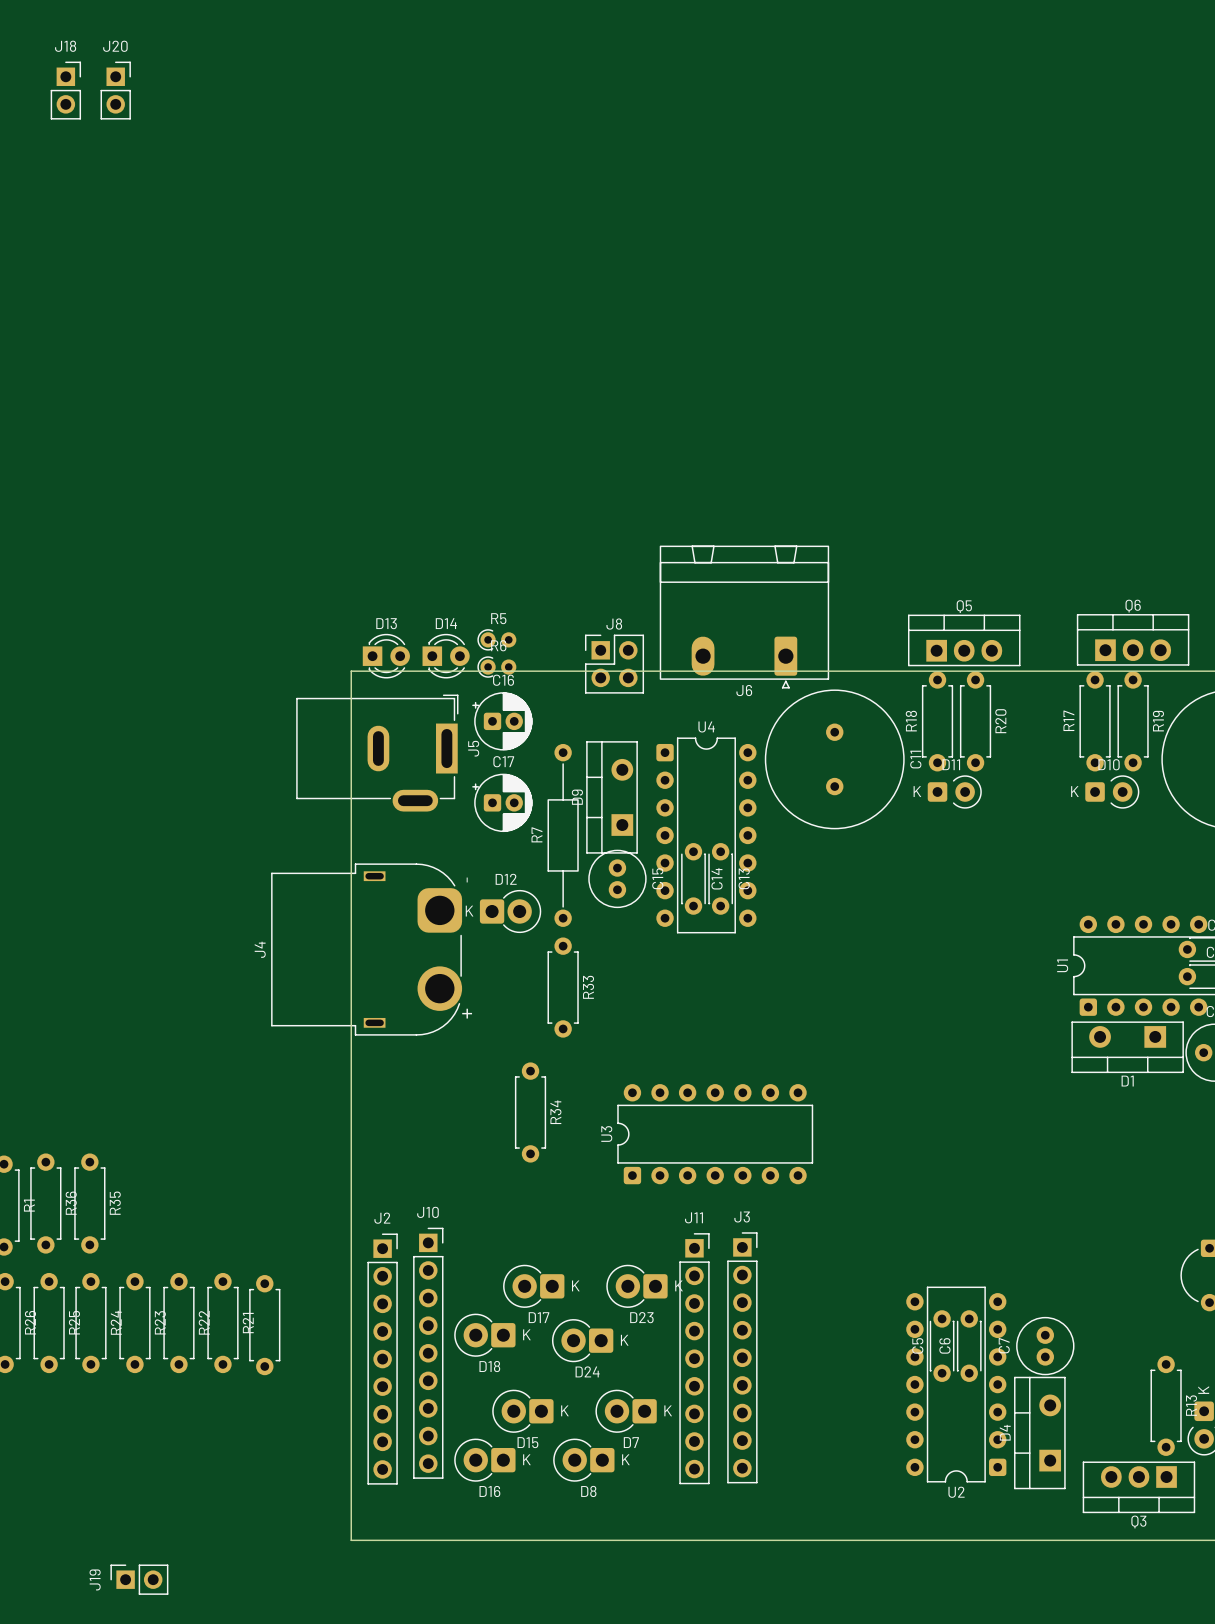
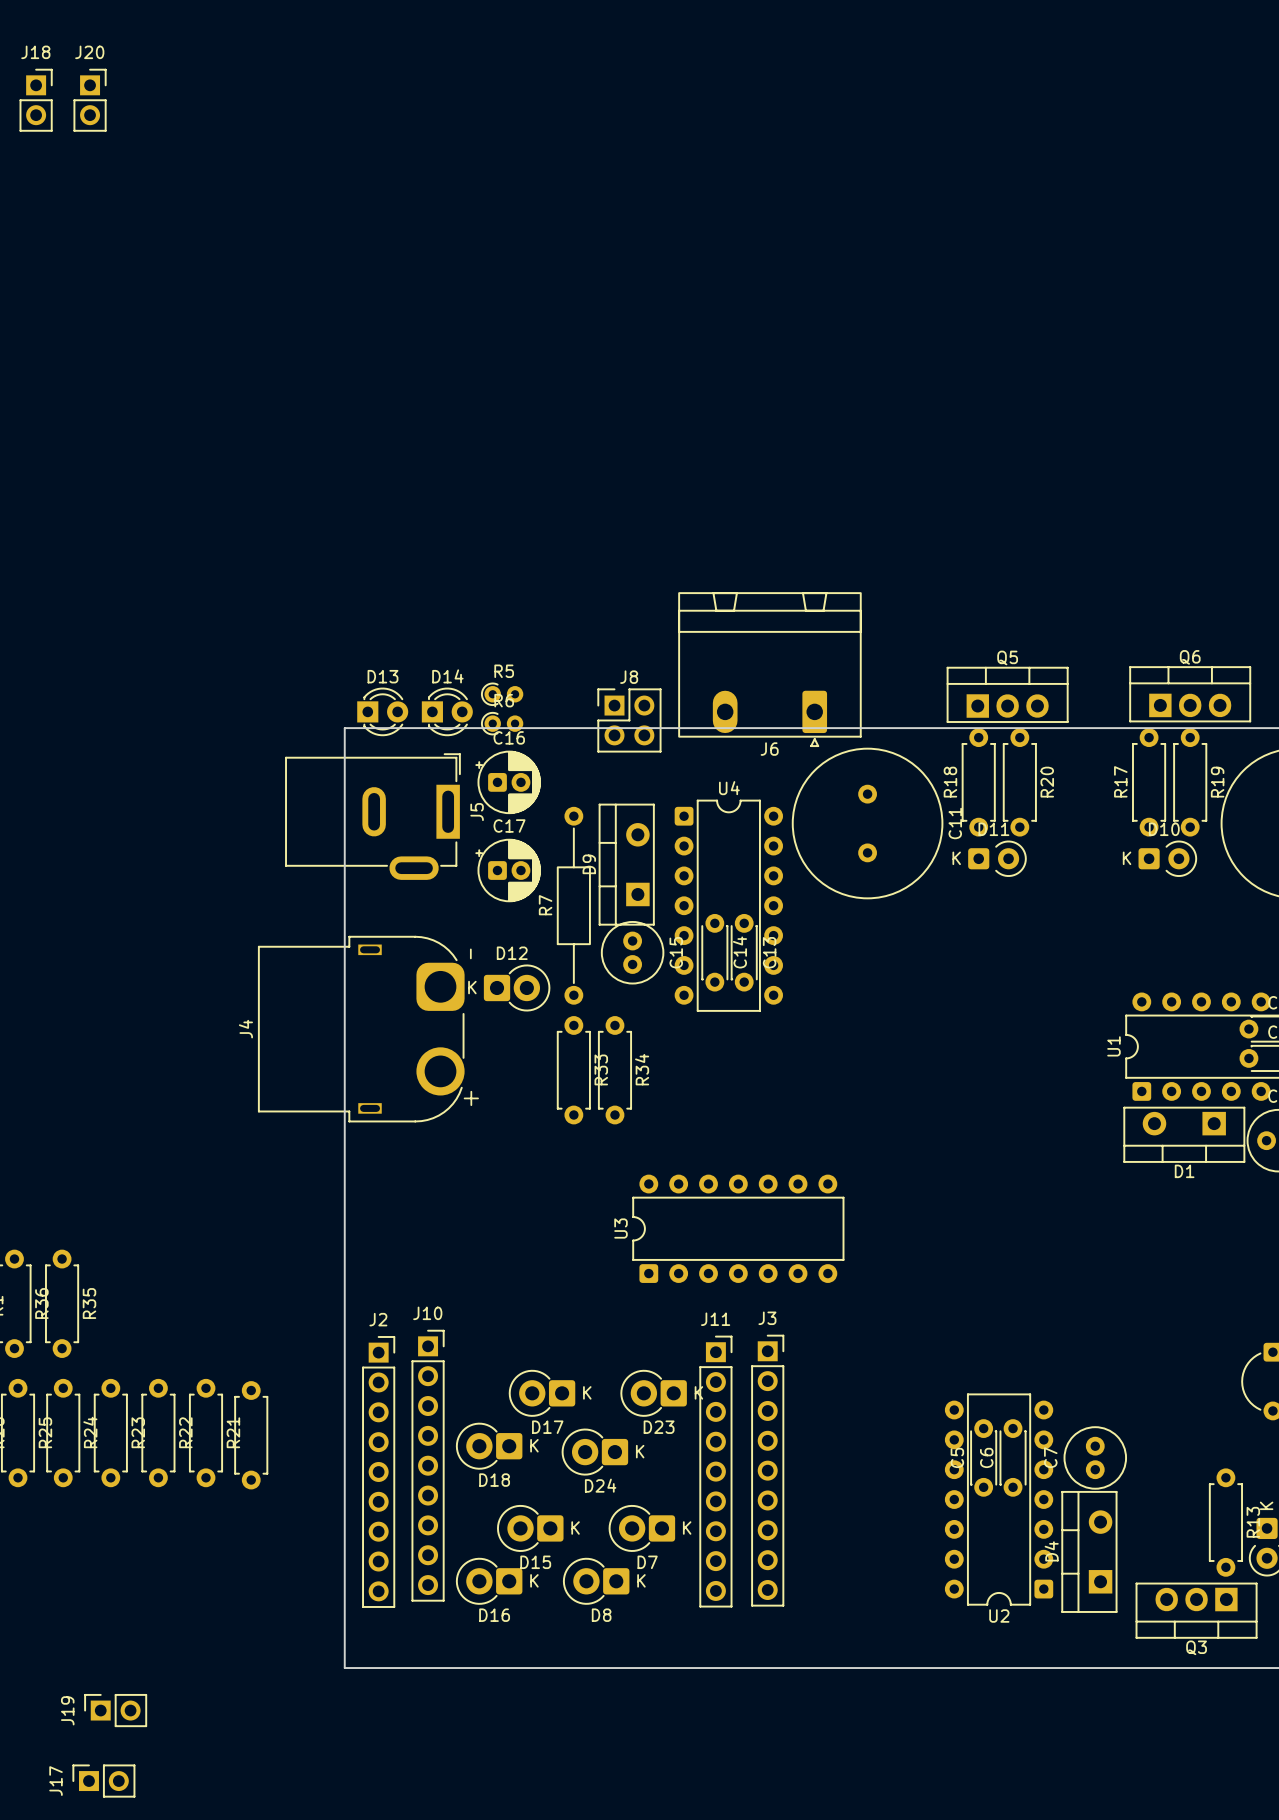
R34 position: (530, 1112) -> (614, 1070)

